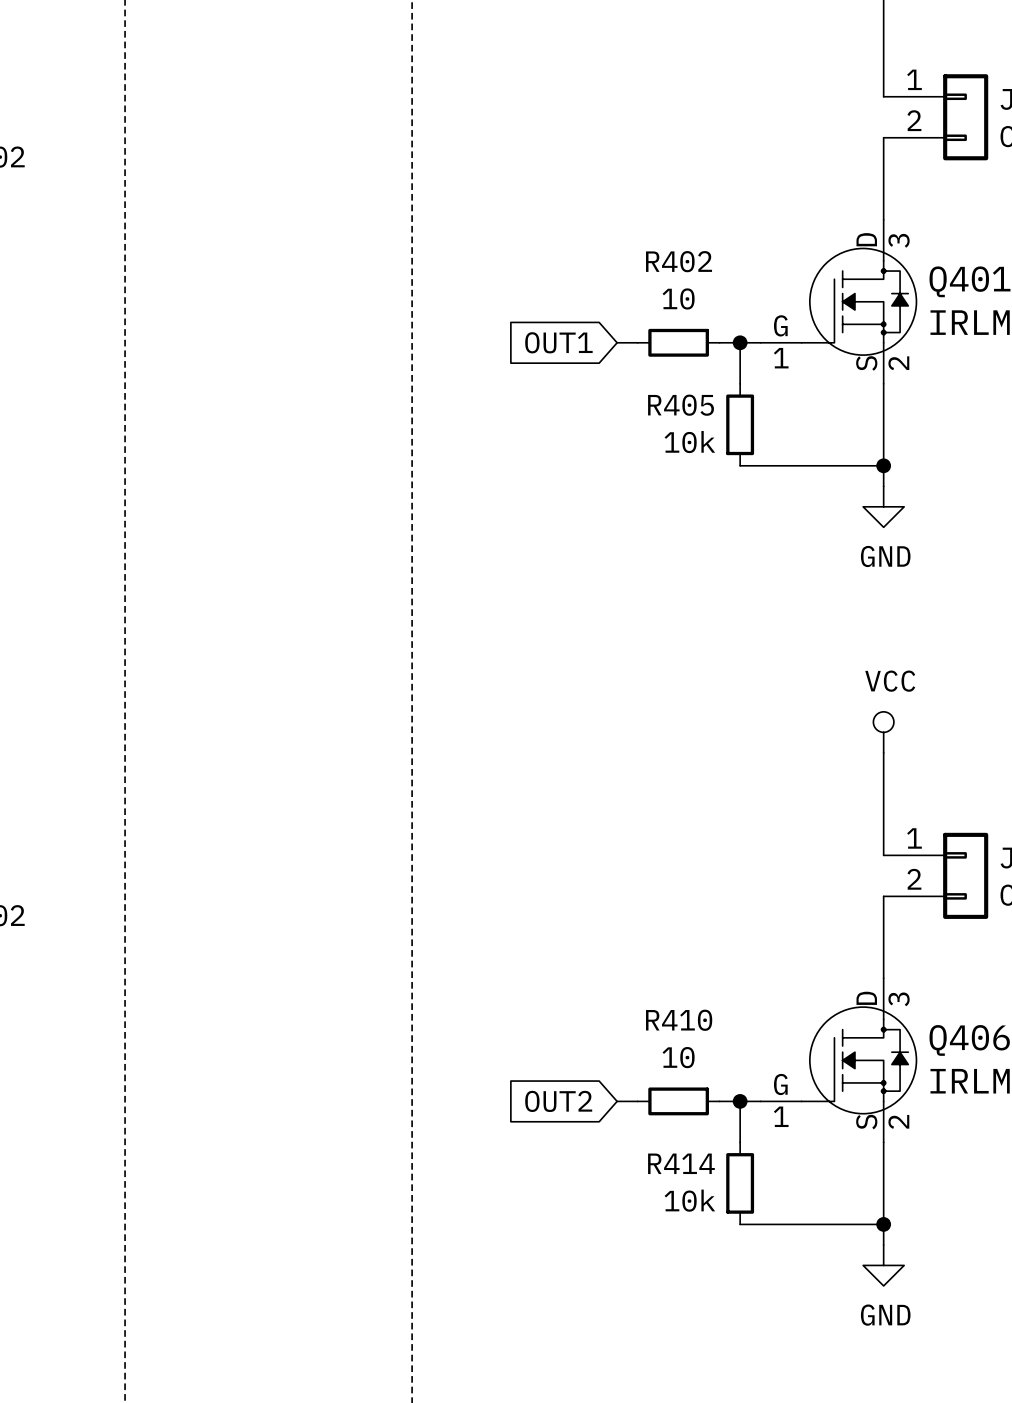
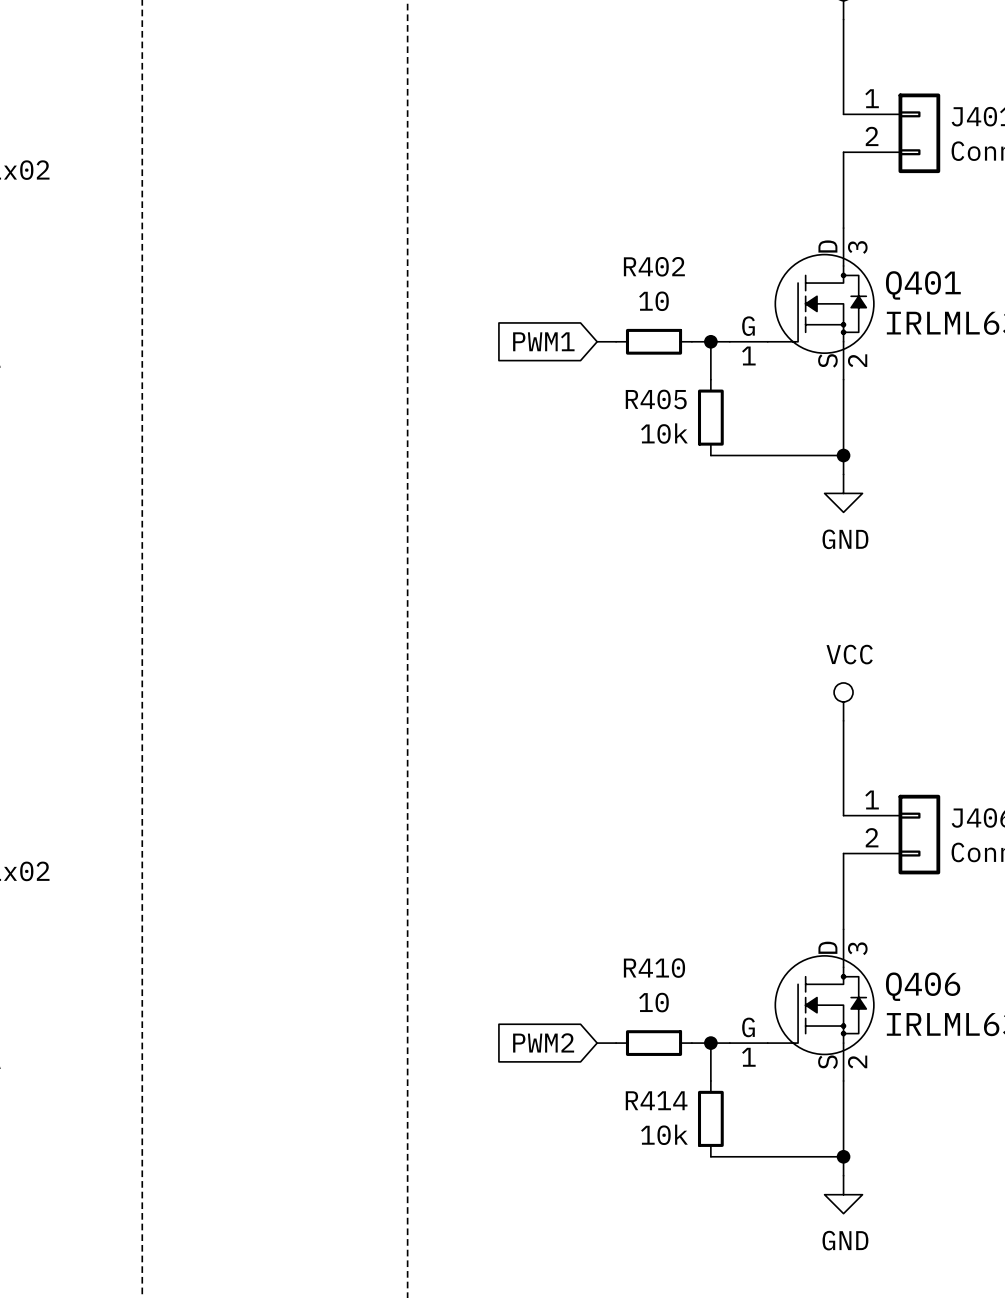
global label: OUT1 (558, 342) -> PWM1 (543, 341)
global label: OUT2 (558, 1101) -> PWM2 (543, 1042)

